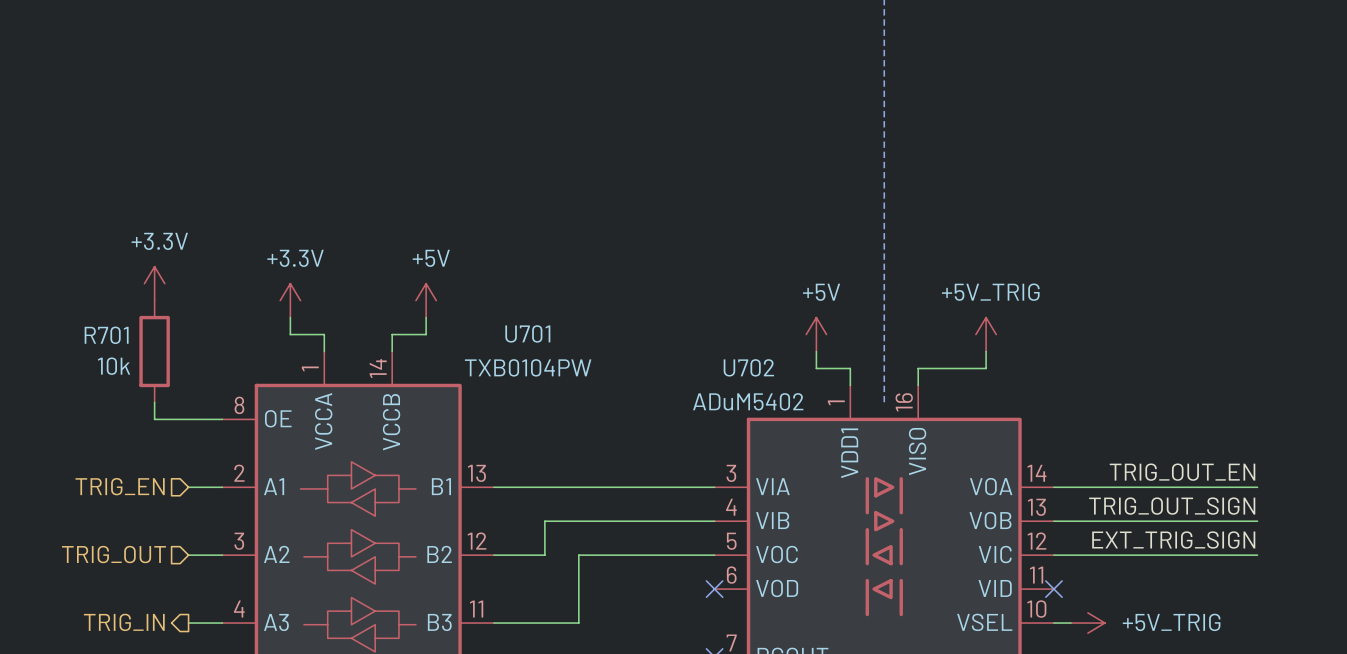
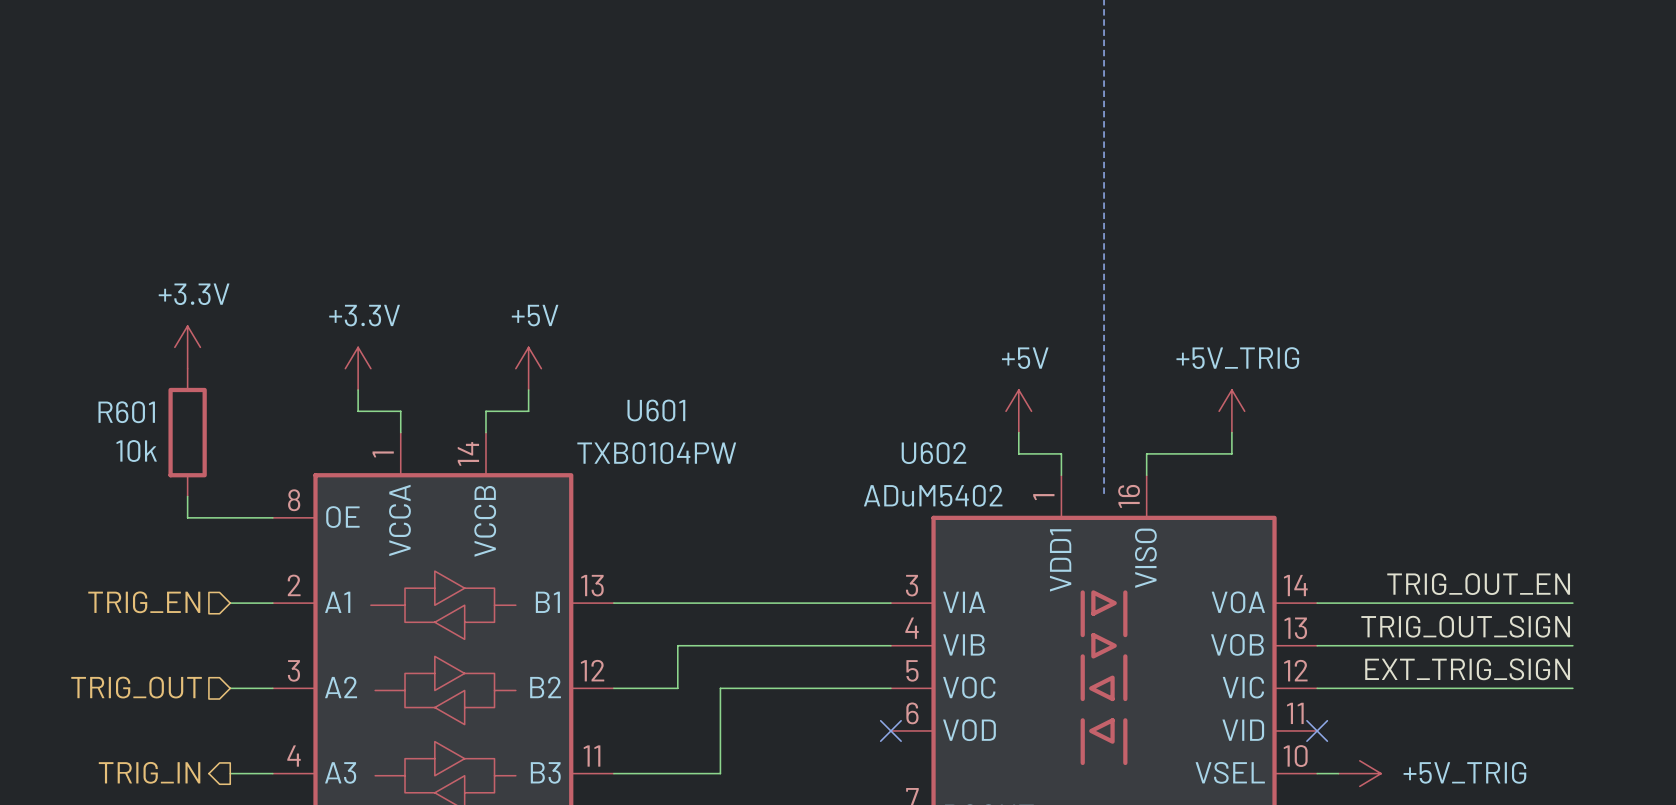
U701 name: U701 (527, 333) -> U601 (656, 410)
R701 name: R701 (106, 335) -> R601 (126, 412)
U702 name: U702 (748, 367) -> U602 (933, 453)

